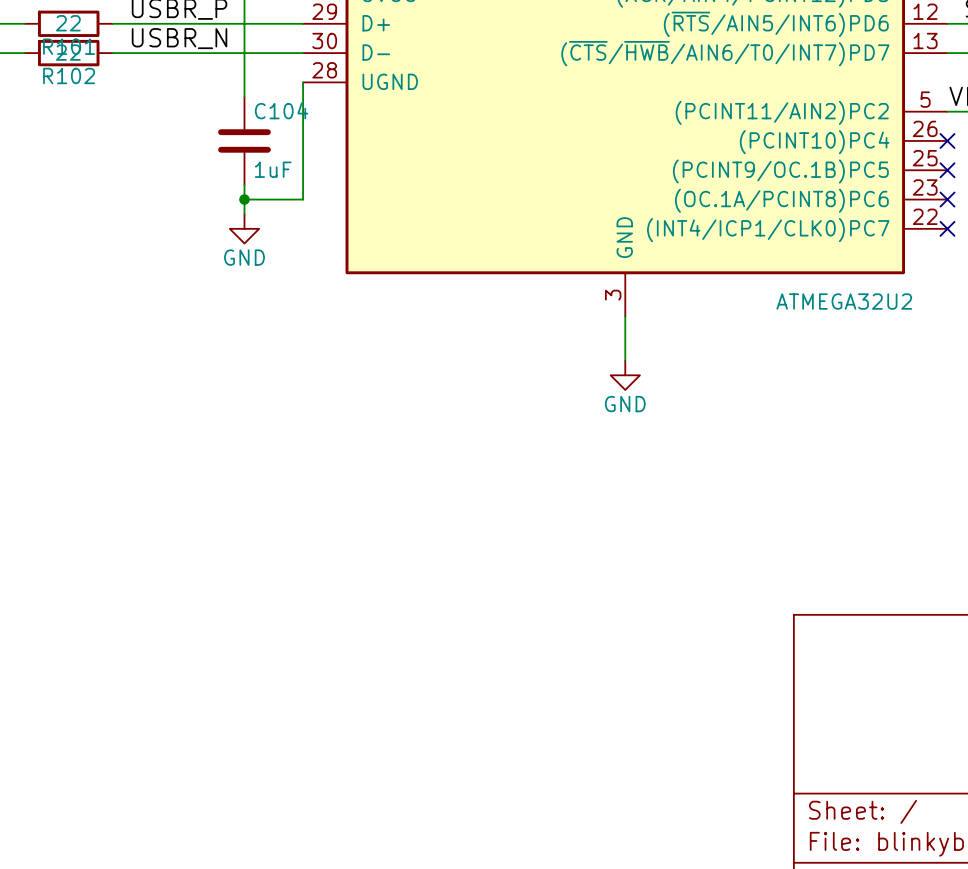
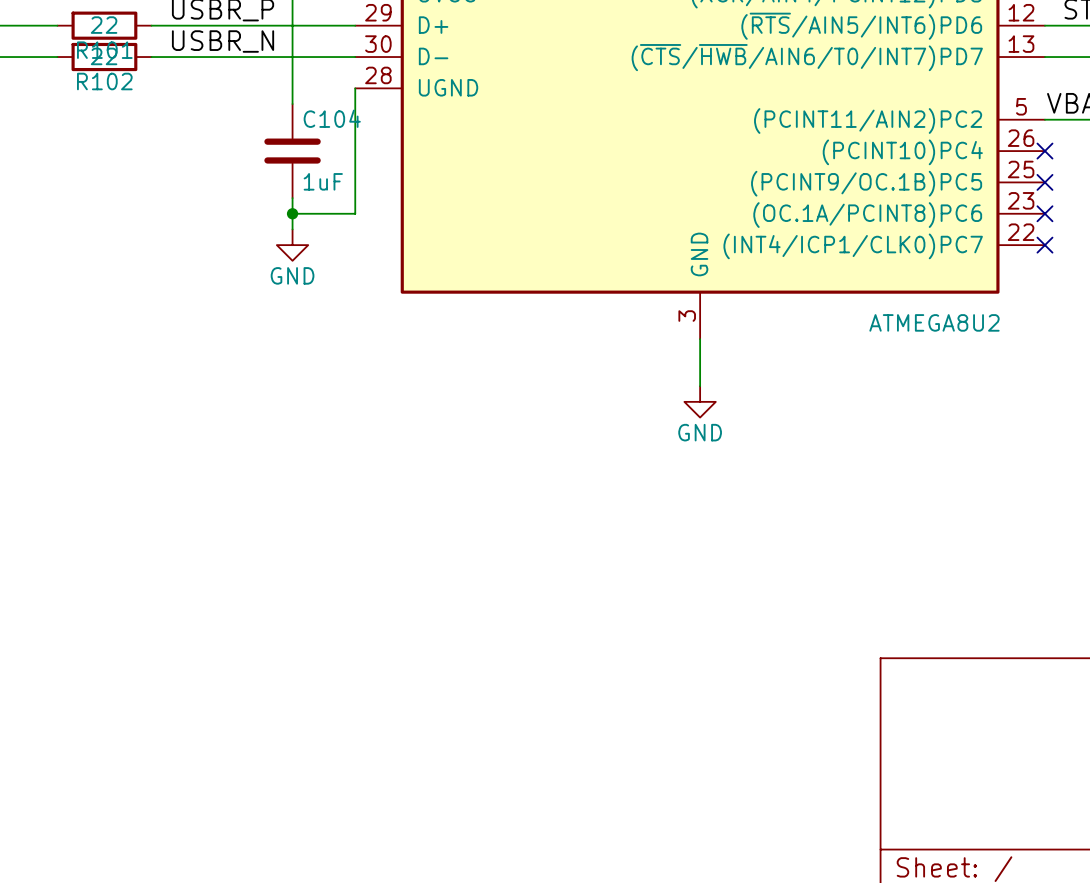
part value: ATMEGA32U2 (844, 301) -> ATMEGA8U2 (934, 322)

